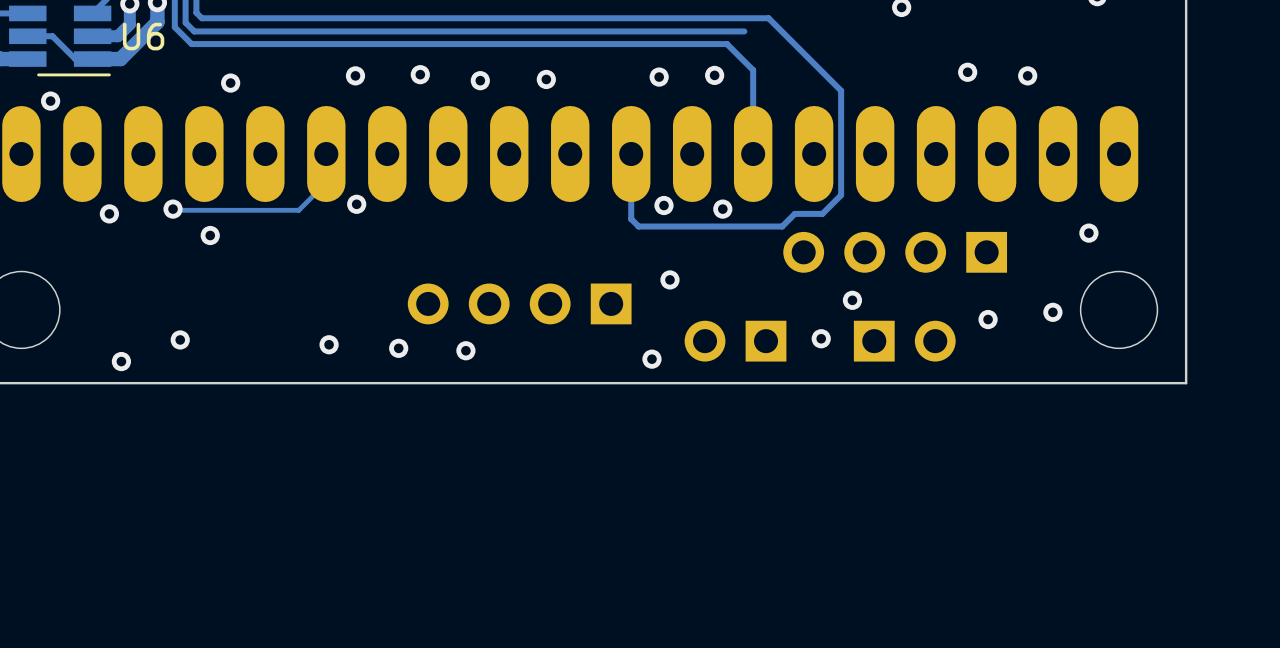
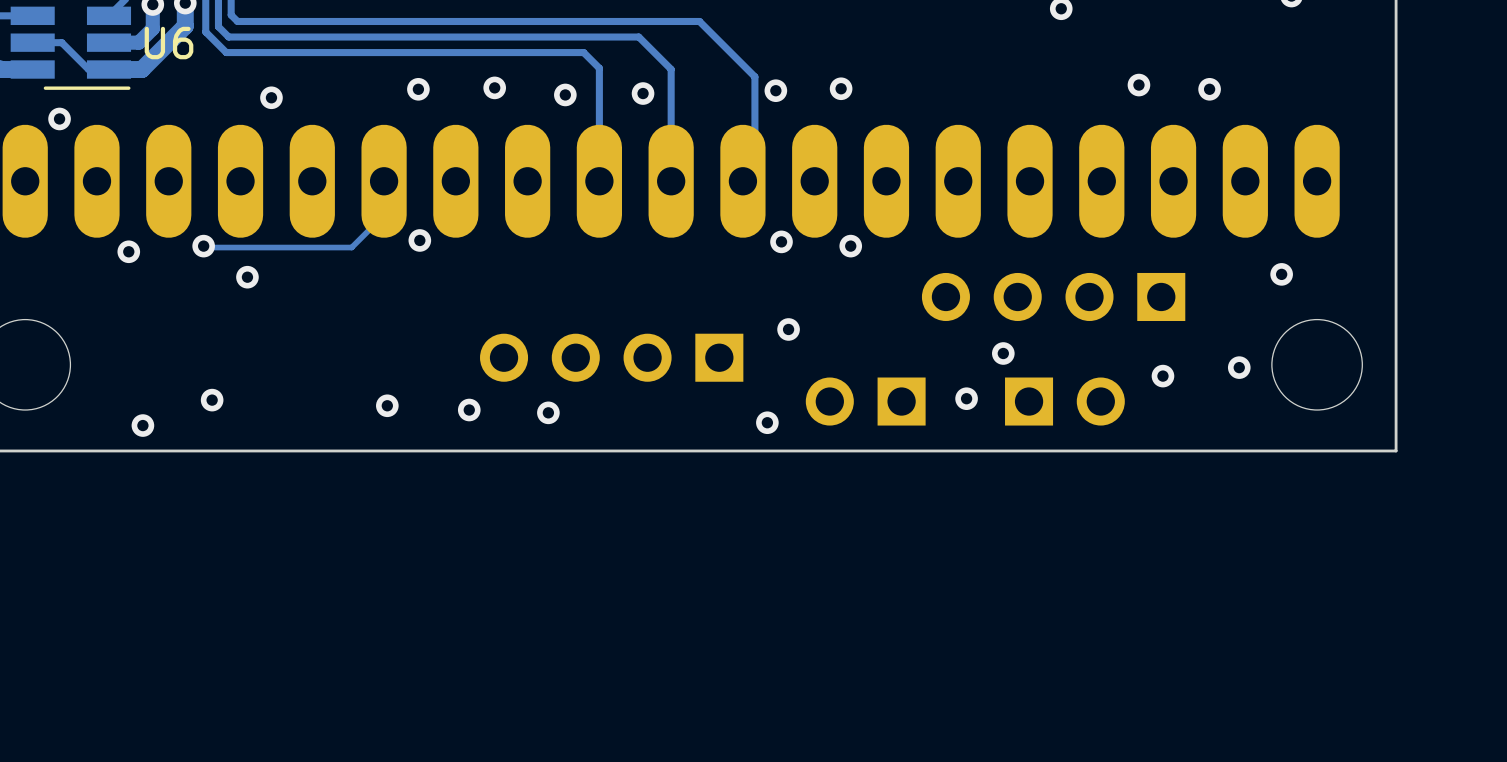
track: (594, 18) (768, 18) (841, 90) (841, 195) (822, 213) (794, 213) (782, 226) (638, 226) (631, 219) (631, 154) -> (699, 21) (754, 76) (754, 181)
track: (744, 31) (542, 31) -> (671, 181) (671, 69) (638, 37)
track: (191, 44) (727, 44) (753, 70) (753, 154) -> (225, 51) (583, 52) (599, 68) (599, 181)

